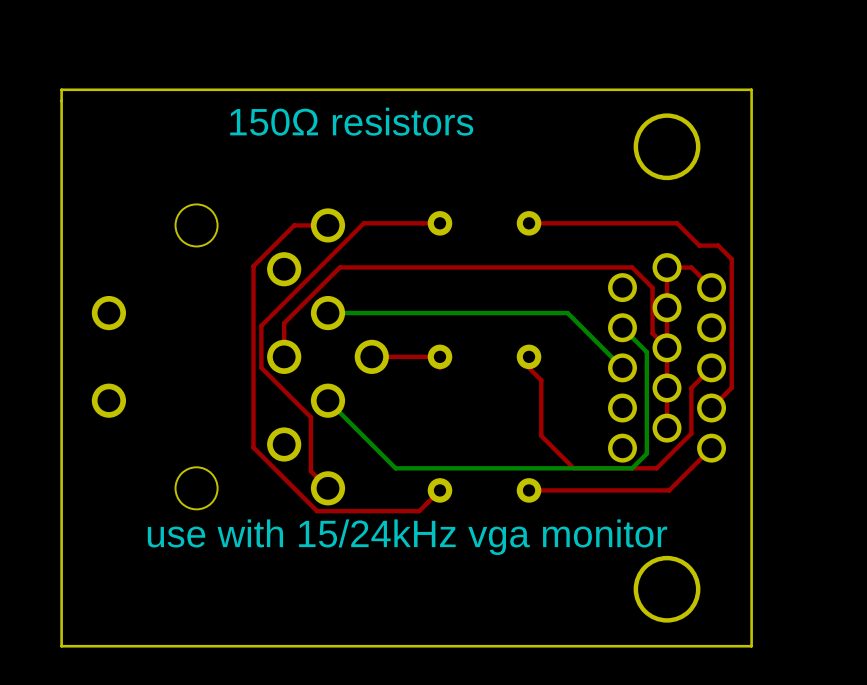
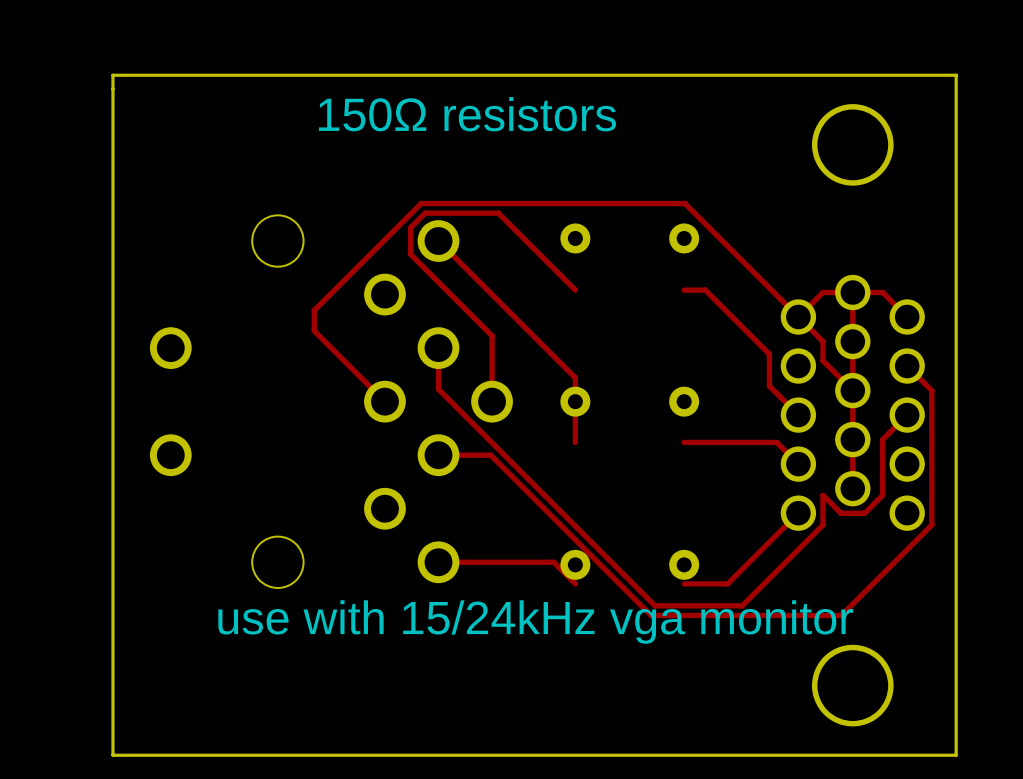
top track: (529, 223) (677, 223) (699, 245) (718, 245) (731, 259) (731, 347) -> (907, 366) (931, 390)
top track: (327, 225) (294, 225) (253, 266) (253, 447) (317, 511) (419, 511) (439, 490) -> (438, 241) (575, 377) (575, 442)
top track: (437, 225) (439, 223) (363, 223) (261, 325) (261, 367) (310, 417) (310, 471) (327, 488) -> (575, 583) (553, 562) (438, 562)
top track: none -> (684, 290) (705, 290) (769, 354) (769, 386) (798, 415)
top track: none -> (852, 292) (822, 292) (798, 316)
bottom track: (327, 313) (567, 313) (622, 367) -> none
bottom track: (622, 327) (646, 352) (646, 453) (632, 468) (395, 468) (327, 400) -> none
top track: (652, 333) (652, 287) (632, 267) (339, 267) (284, 323) (284, 356) -> (835, 372) (823, 360) (823, 341) (684, 203) (421, 203) (314, 310) (314, 330) (384, 401)
top track: (371, 356) (428, 356) (439, 368) -> (492, 401) (492, 335) (410, 254) (410, 227) (425, 213) (498, 213) (575, 290)
top track: (529, 368) (541, 380) (541, 435) (573, 468) (656, 468) (676, 448) -> (438, 348) (438, 389) (655, 605) (742, 605) (823, 524) (823, 495) (840, 513) (864, 513)
top track: (731, 387) (711, 408) -> (931, 439) (931, 524) (841, 615) (651, 615) (490, 455) (438, 455)
top track: none -> (684, 442) (776, 442) (798, 464)
top track: none -> (798, 513) (727, 583) (684, 583)
top track: (711, 448) (669, 490) (529, 490) -> none

